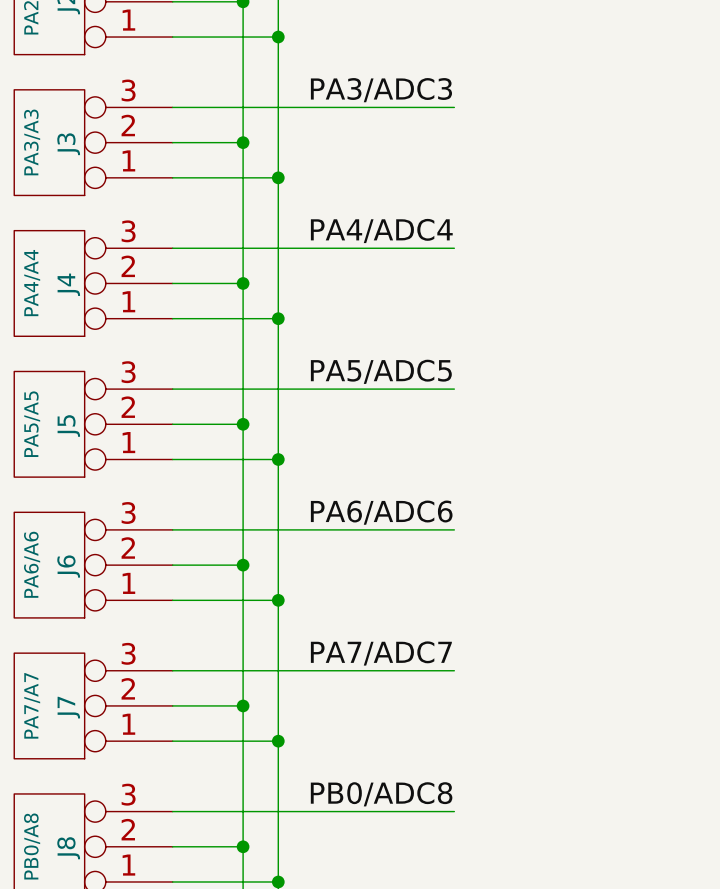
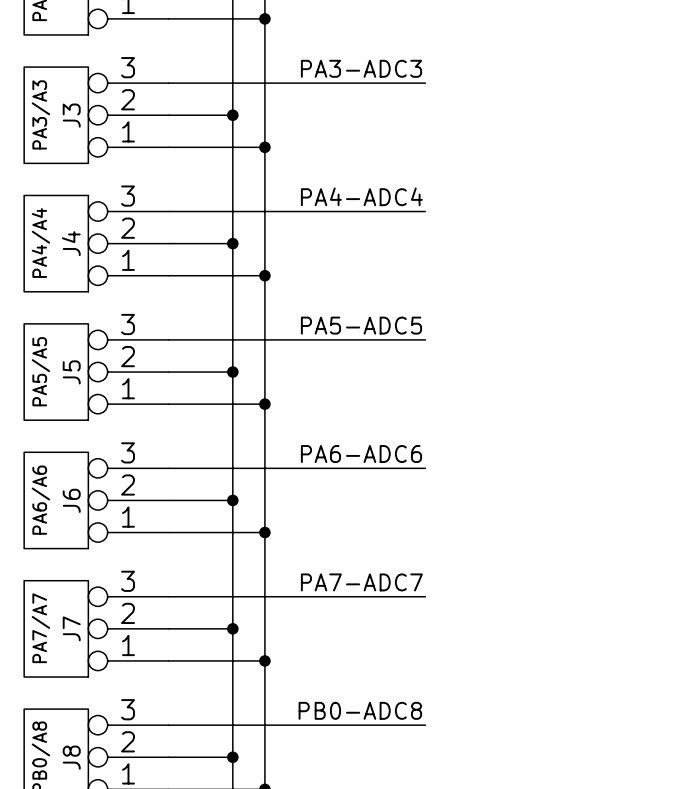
label: PA3/ADC3 (381, 90) -> PA3-ADC3 (361, 68)
label: PA4/ADC4 (381, 230) -> PA4-ADC4 (361, 196)
label: PA5/ADC5 (381, 371) -> PA5-ADC5 (361, 325)
label: PA6/ADC6 (381, 512) -> PA6-ADC6 (361, 454)
label: PA7/ADC7 (381, 653) -> PA7-ADC7 (361, 582)
label: PB0/ADC8 (381, 794) -> PB0-ADC8 (360, 710)

